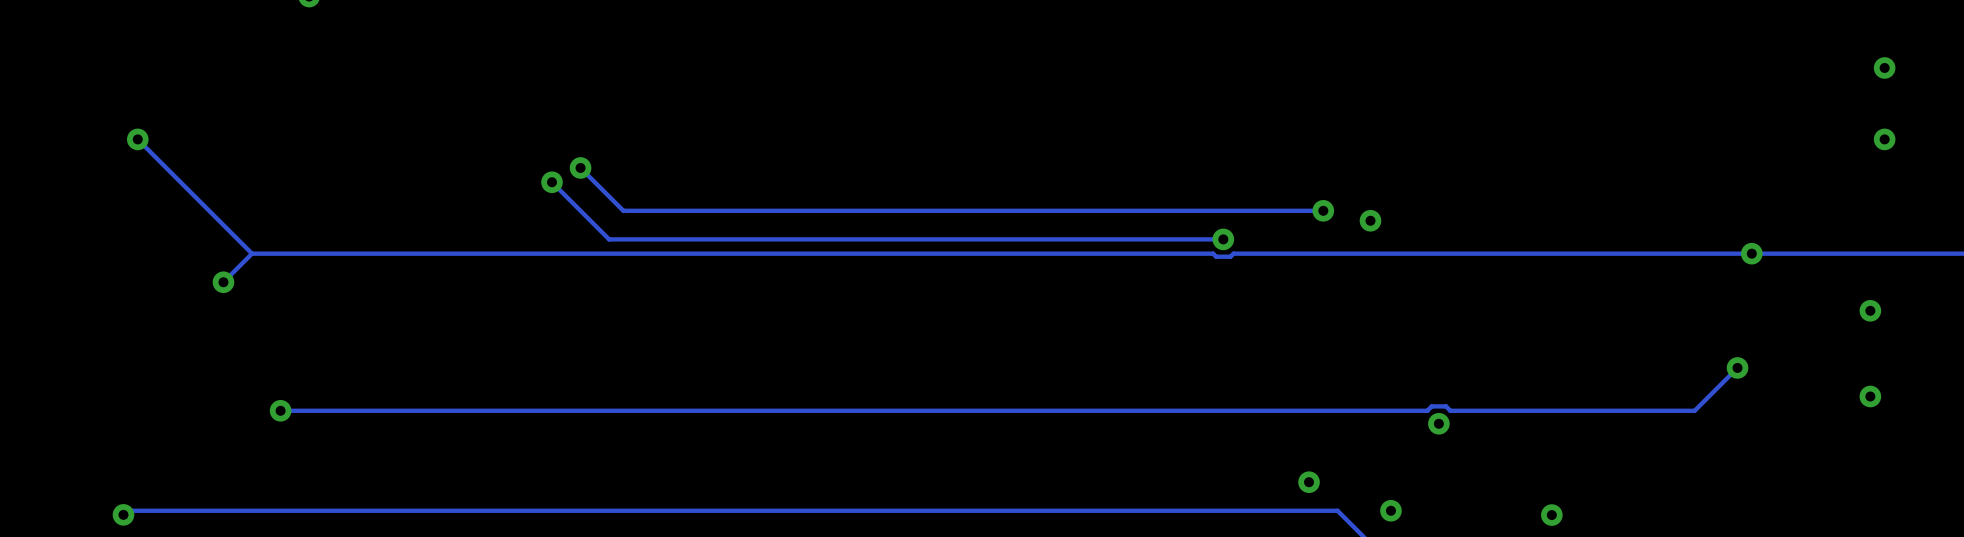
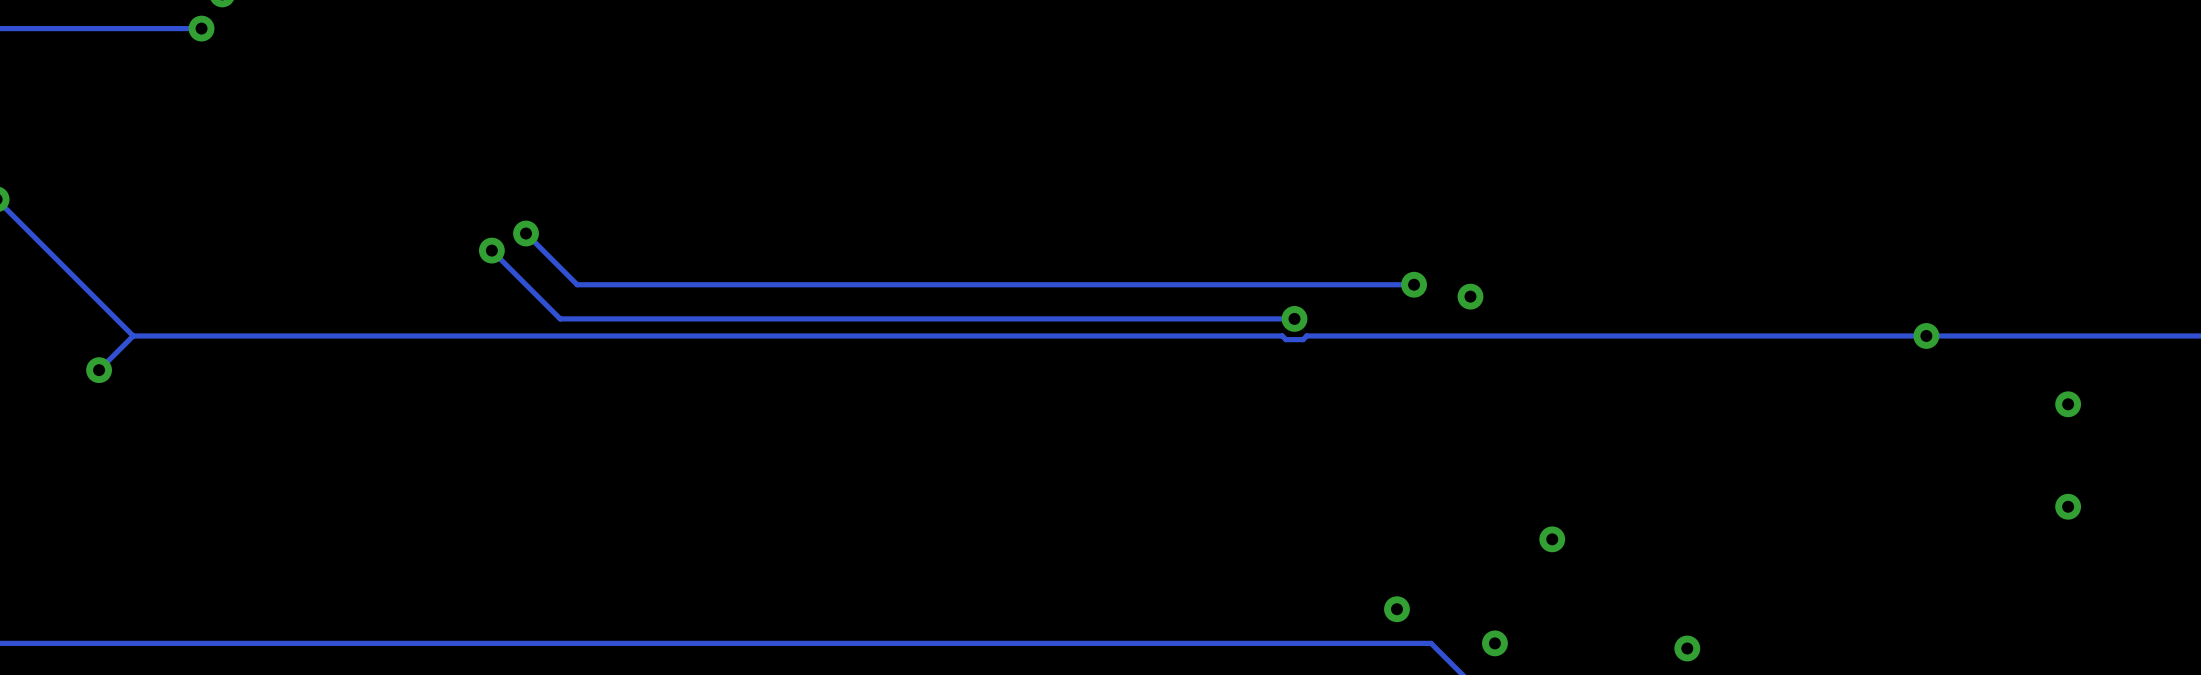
via: (1884, 67) -> none
via: (1884, 139) -> none
track: (1737, 367) (1694, 410) (1450, 410) (1446, 406) (1431, 406) (1427, 410) (280, 410) -> none
via: (1737, 367) -> none
via: (280, 410) -> none

